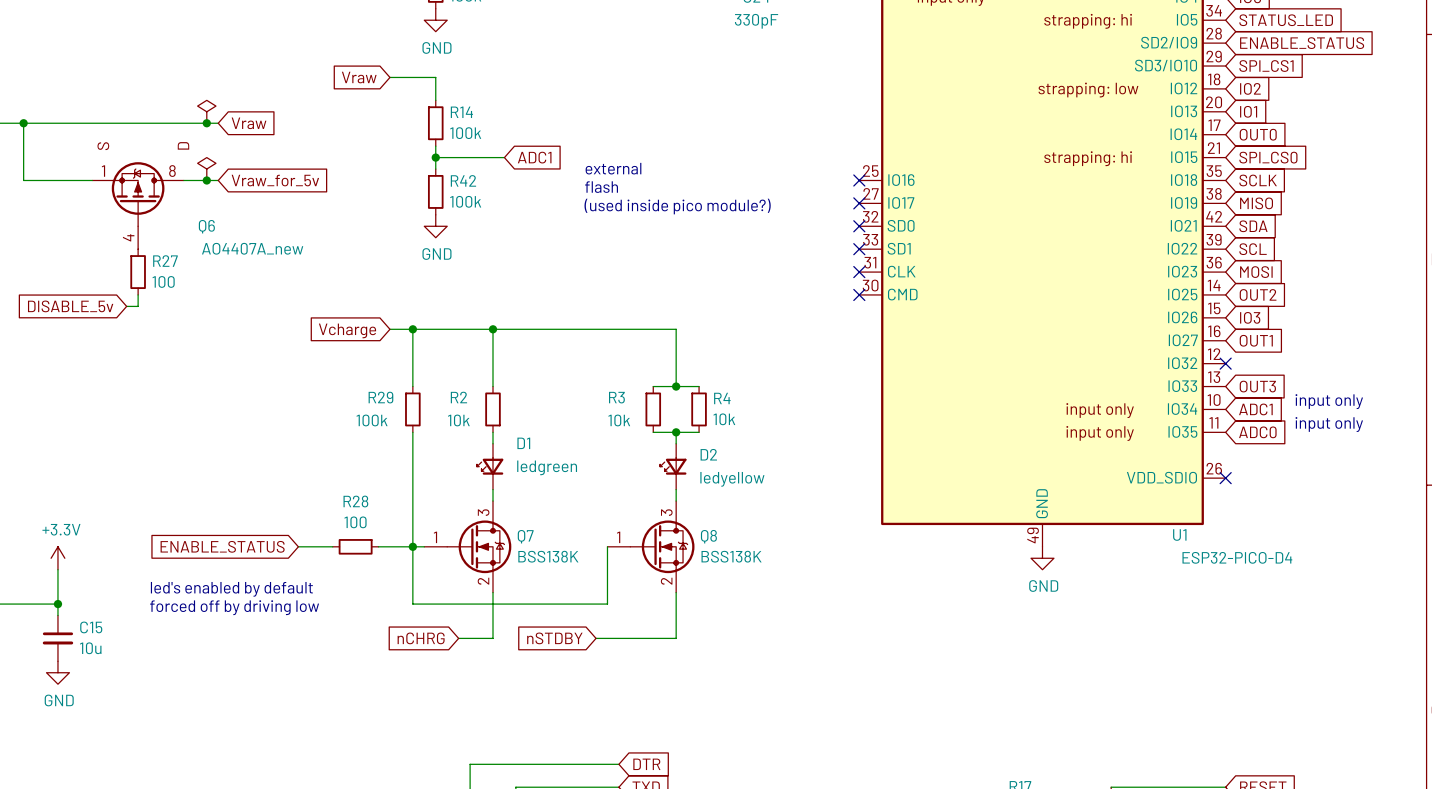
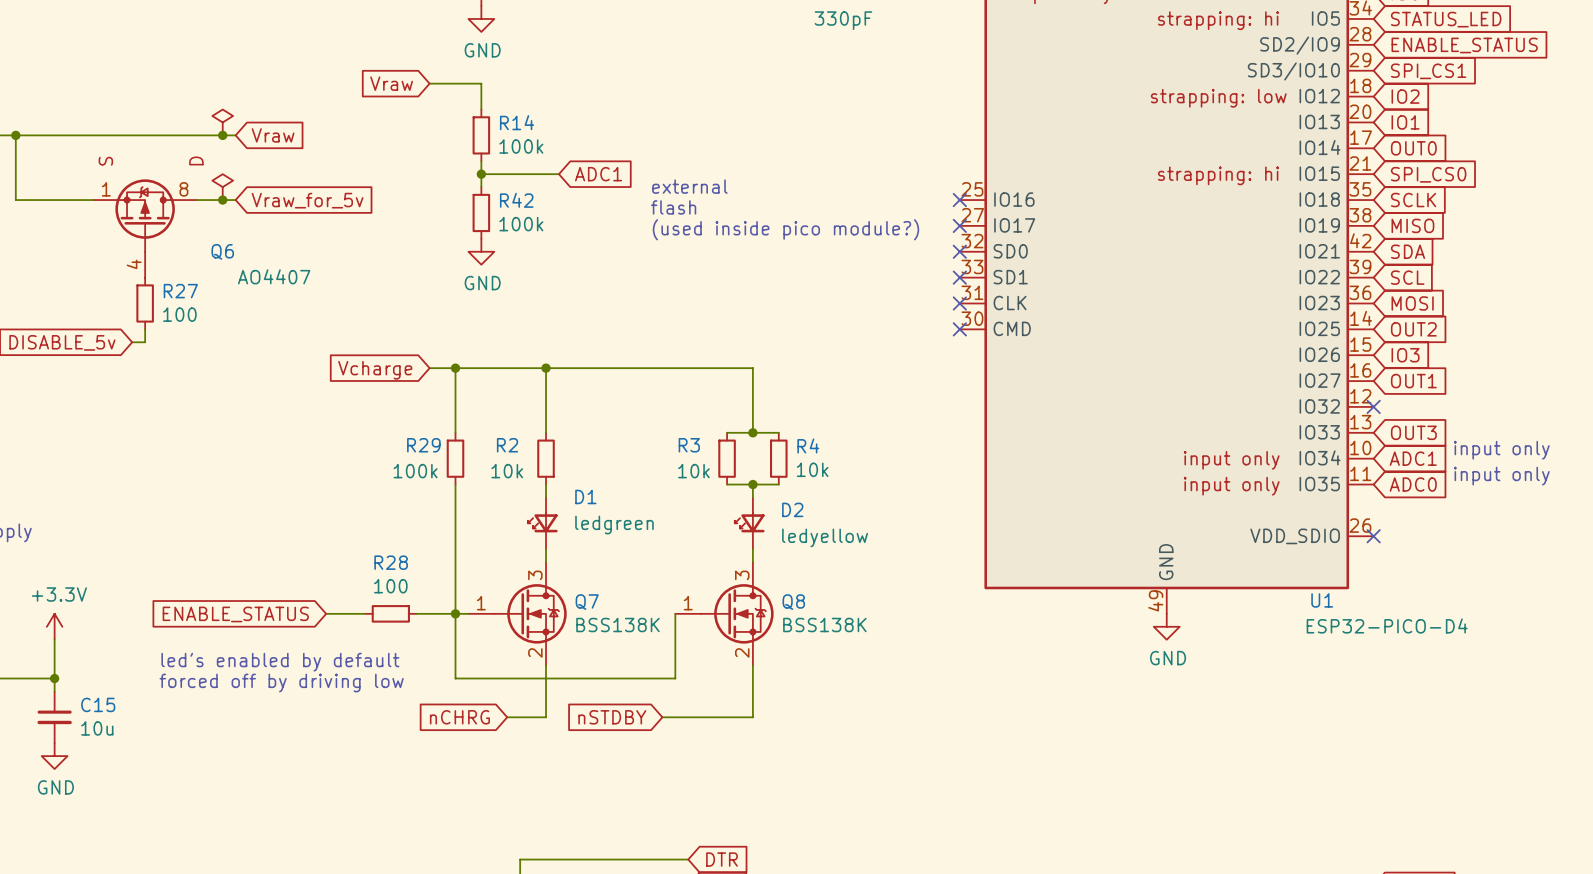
Q6 value: AO4407A_new (252, 248) -> AO4407 (274, 276)

